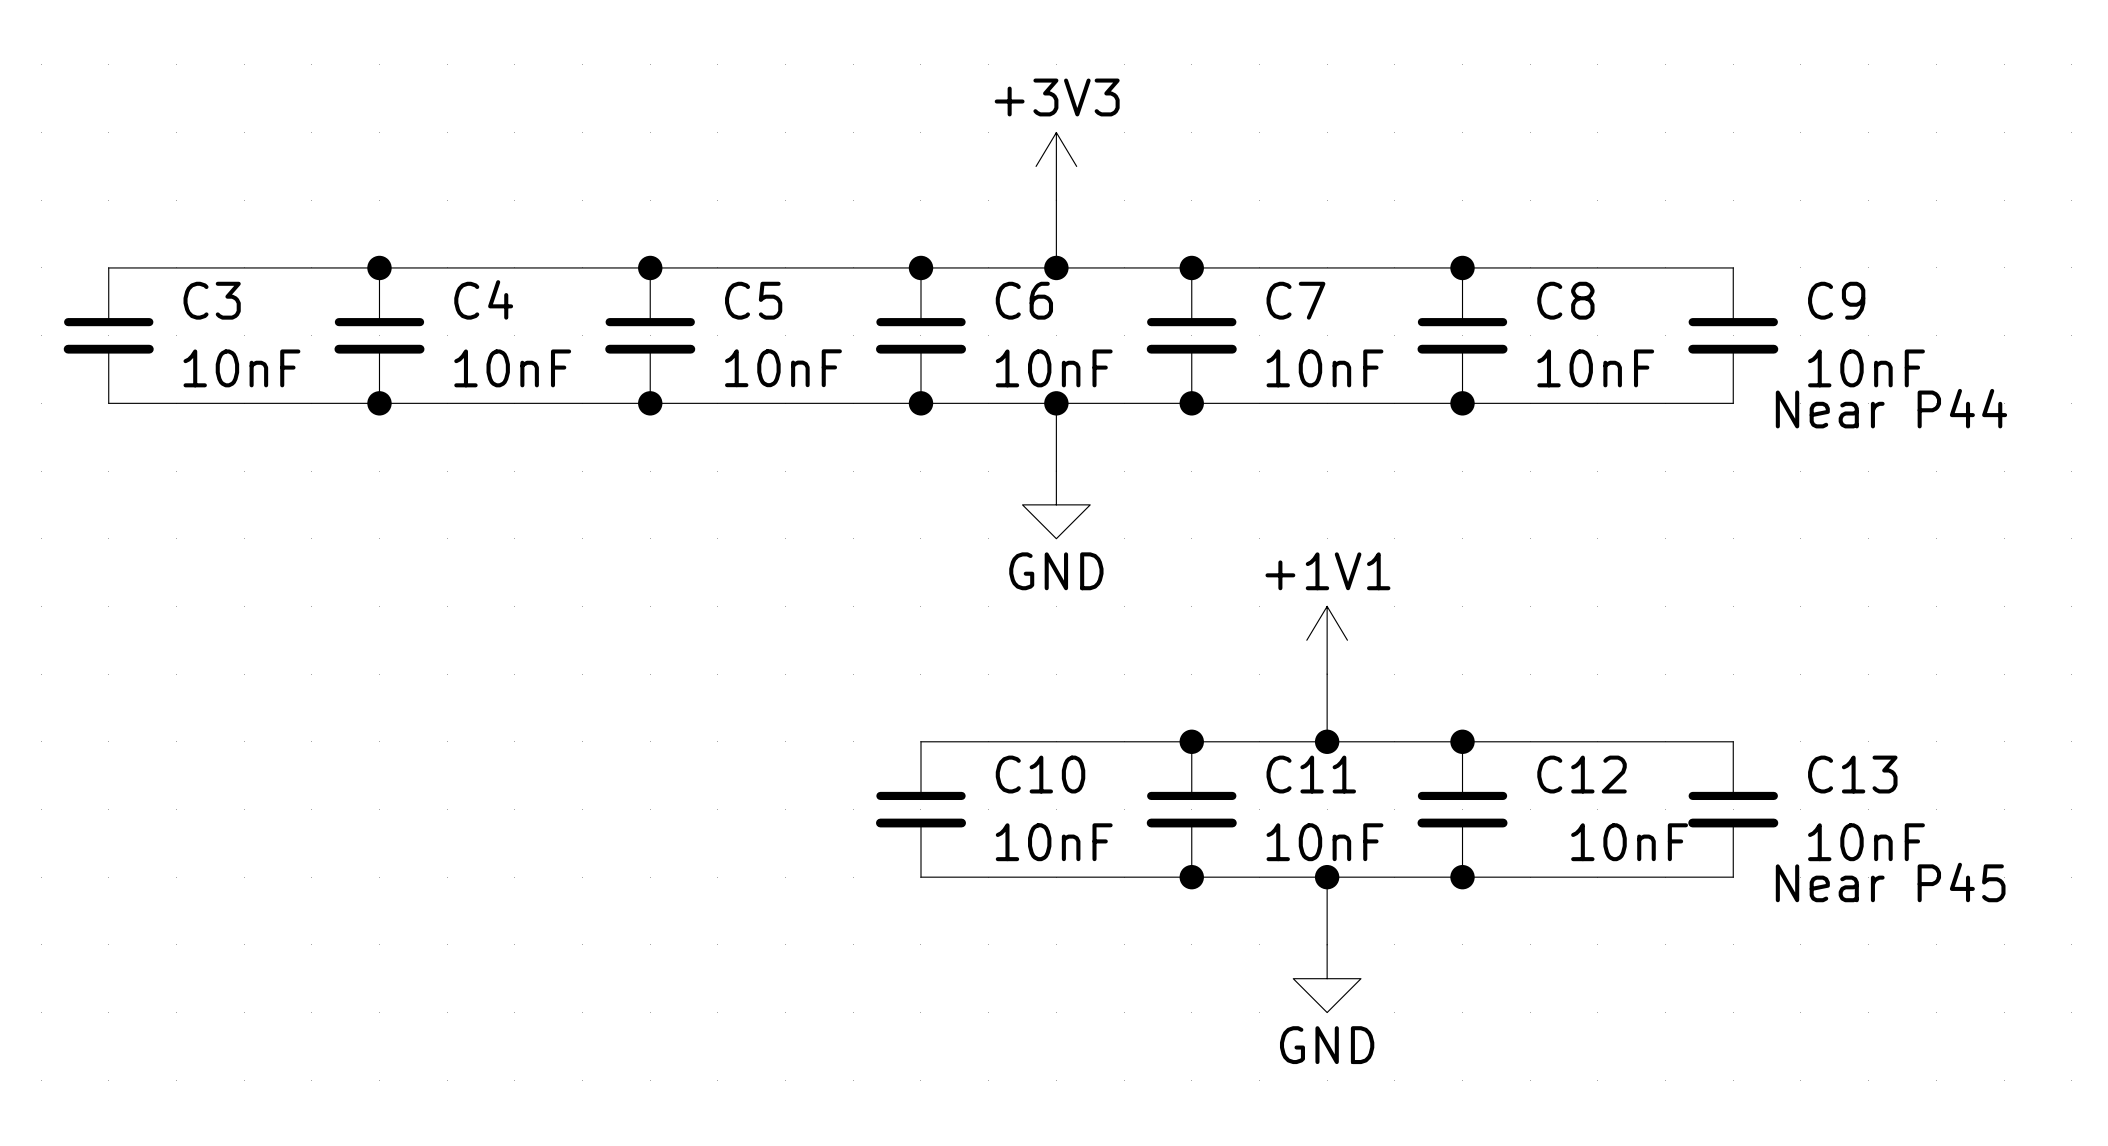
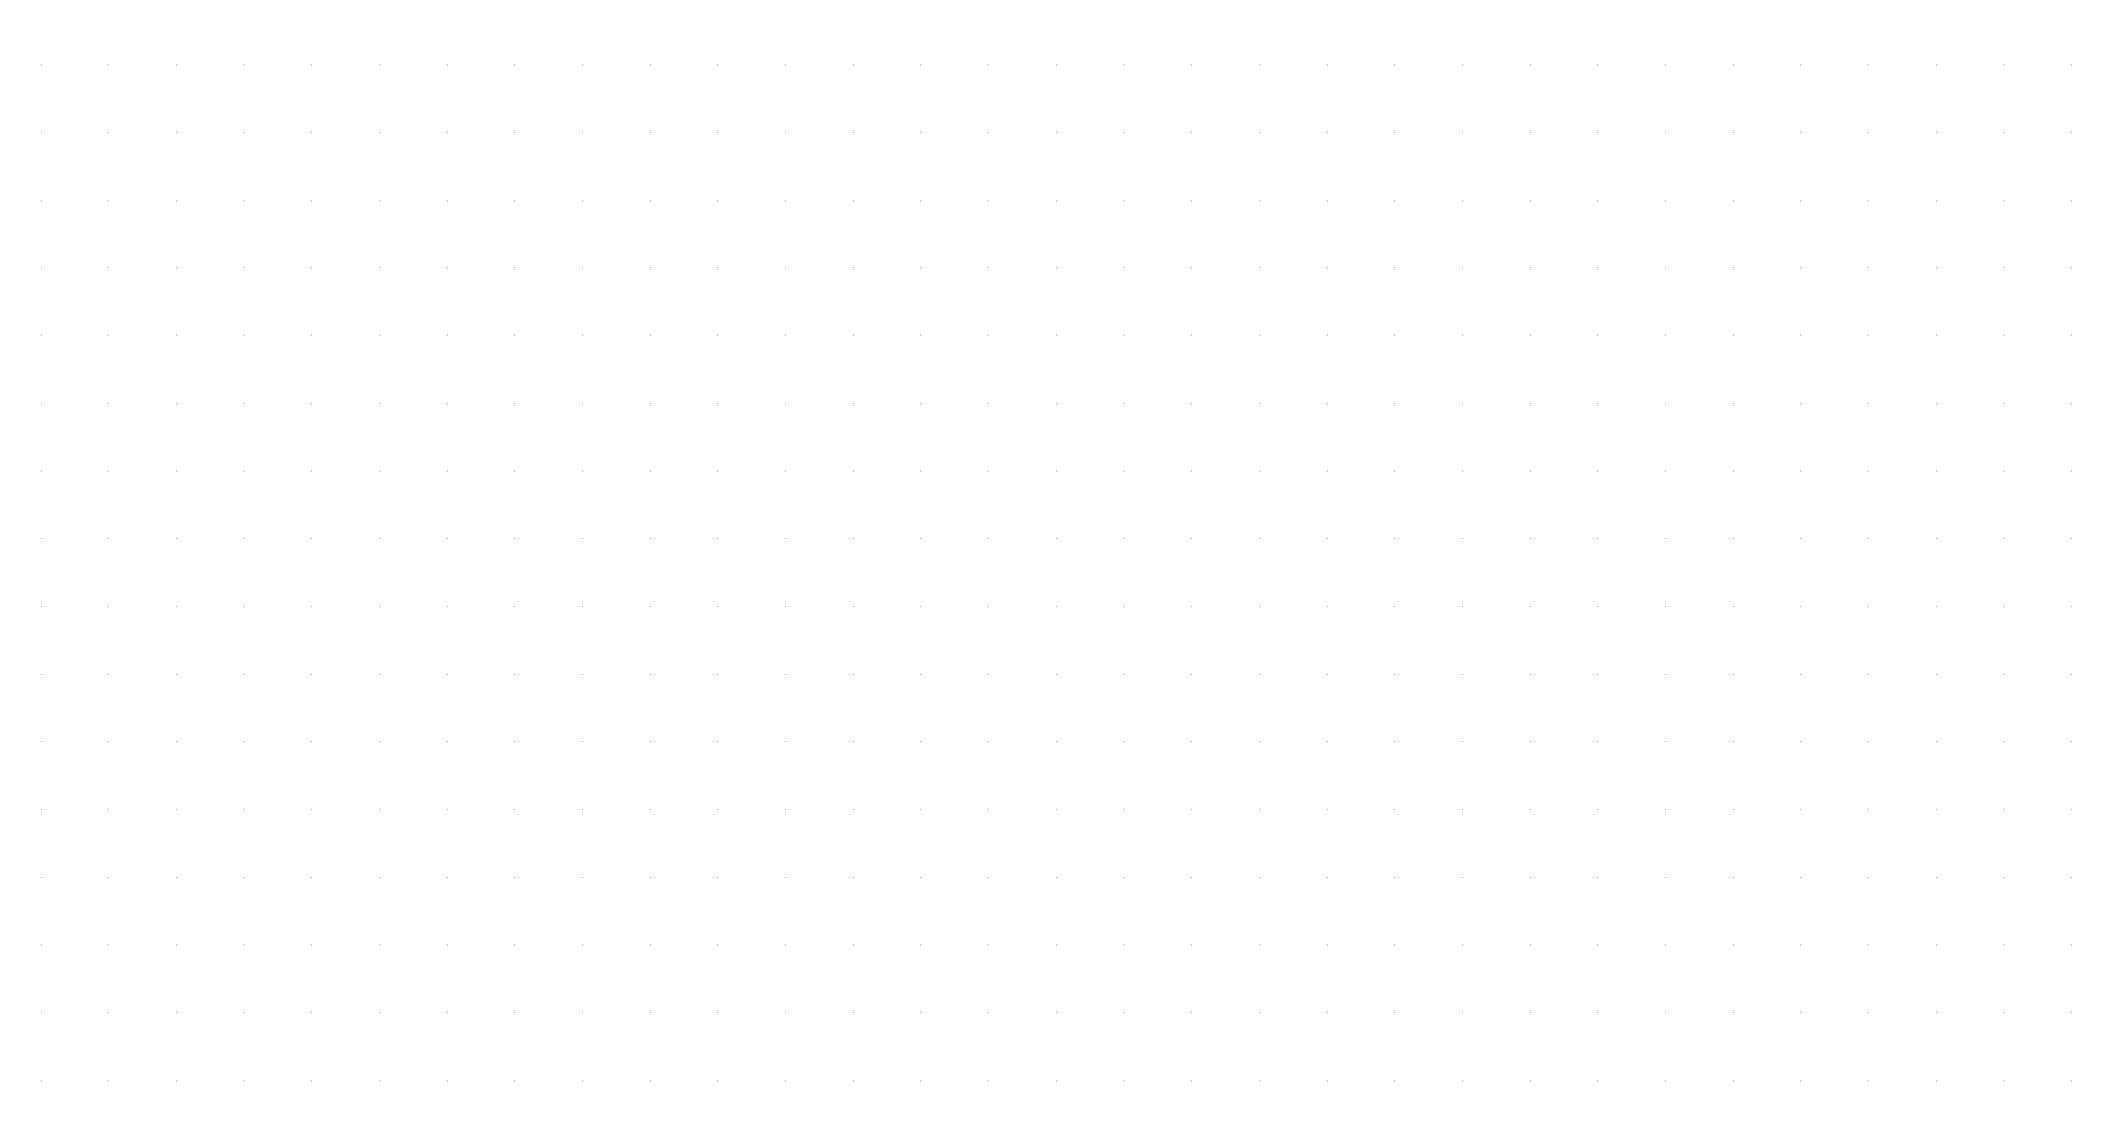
power symbol: +3V3 (1056, 166) -> none
wire: (1056, 200) (1056, 267) -> none
wire: (108, 267) (1733, 267) -> none
junction: (379, 267) -> none
junction: (650, 267) -> none
junction: (920, 267) -> none
junction: (1056, 267) -> none
junction: (1191, 267) -> none
junction: (1462, 267) -> none
C3: 10nF (108, 335) -> none
C4: 10nF (379, 335) -> none
C5: 10nF (650, 335) -> none
C6: 10nF (920, 335) -> none
C7: 10nF (1191, 335) -> none
C8: 10nF (1462, 335) -> none
C9: 10nF (1733, 335) -> none
wire: (108, 403) (1733, 403) -> none
junction: (379, 403) -> none
junction: (650, 403) -> none
junction: (920, 403) -> none
wire: (1056, 403) (1056, 471) -> none
junction: (1056, 403) -> none
junction: (1191, 403) -> none
junction: (1462, 403) -> none
text: Near P44 (1891, 408) -> none
power symbol: GND (1056, 504) -> none
power symbol: +1V1 (1327, 640) -> none
wire: (1327, 674) (1327, 741) -> none
wire: (920, 741) (1733, 741) -> none
junction: (1191, 741) -> none
junction: (1327, 741) -> none
junction: (1462, 741) -> none
C10: 10nF (920, 809) -> none
C11: 10nF (1191, 809) -> none
C12: 10nF (1462, 809) -> none
C13: 10nF (1733, 809) -> none
wire: (920, 877) (1733, 877) -> none
junction: (1191, 877) -> none
wire: (1327, 877) (1327, 944) -> none
junction: (1327, 877) -> none
junction: (1462, 877) -> none
text: Near P45 (1890, 882) -> none
power symbol: GND (1327, 978) -> none

